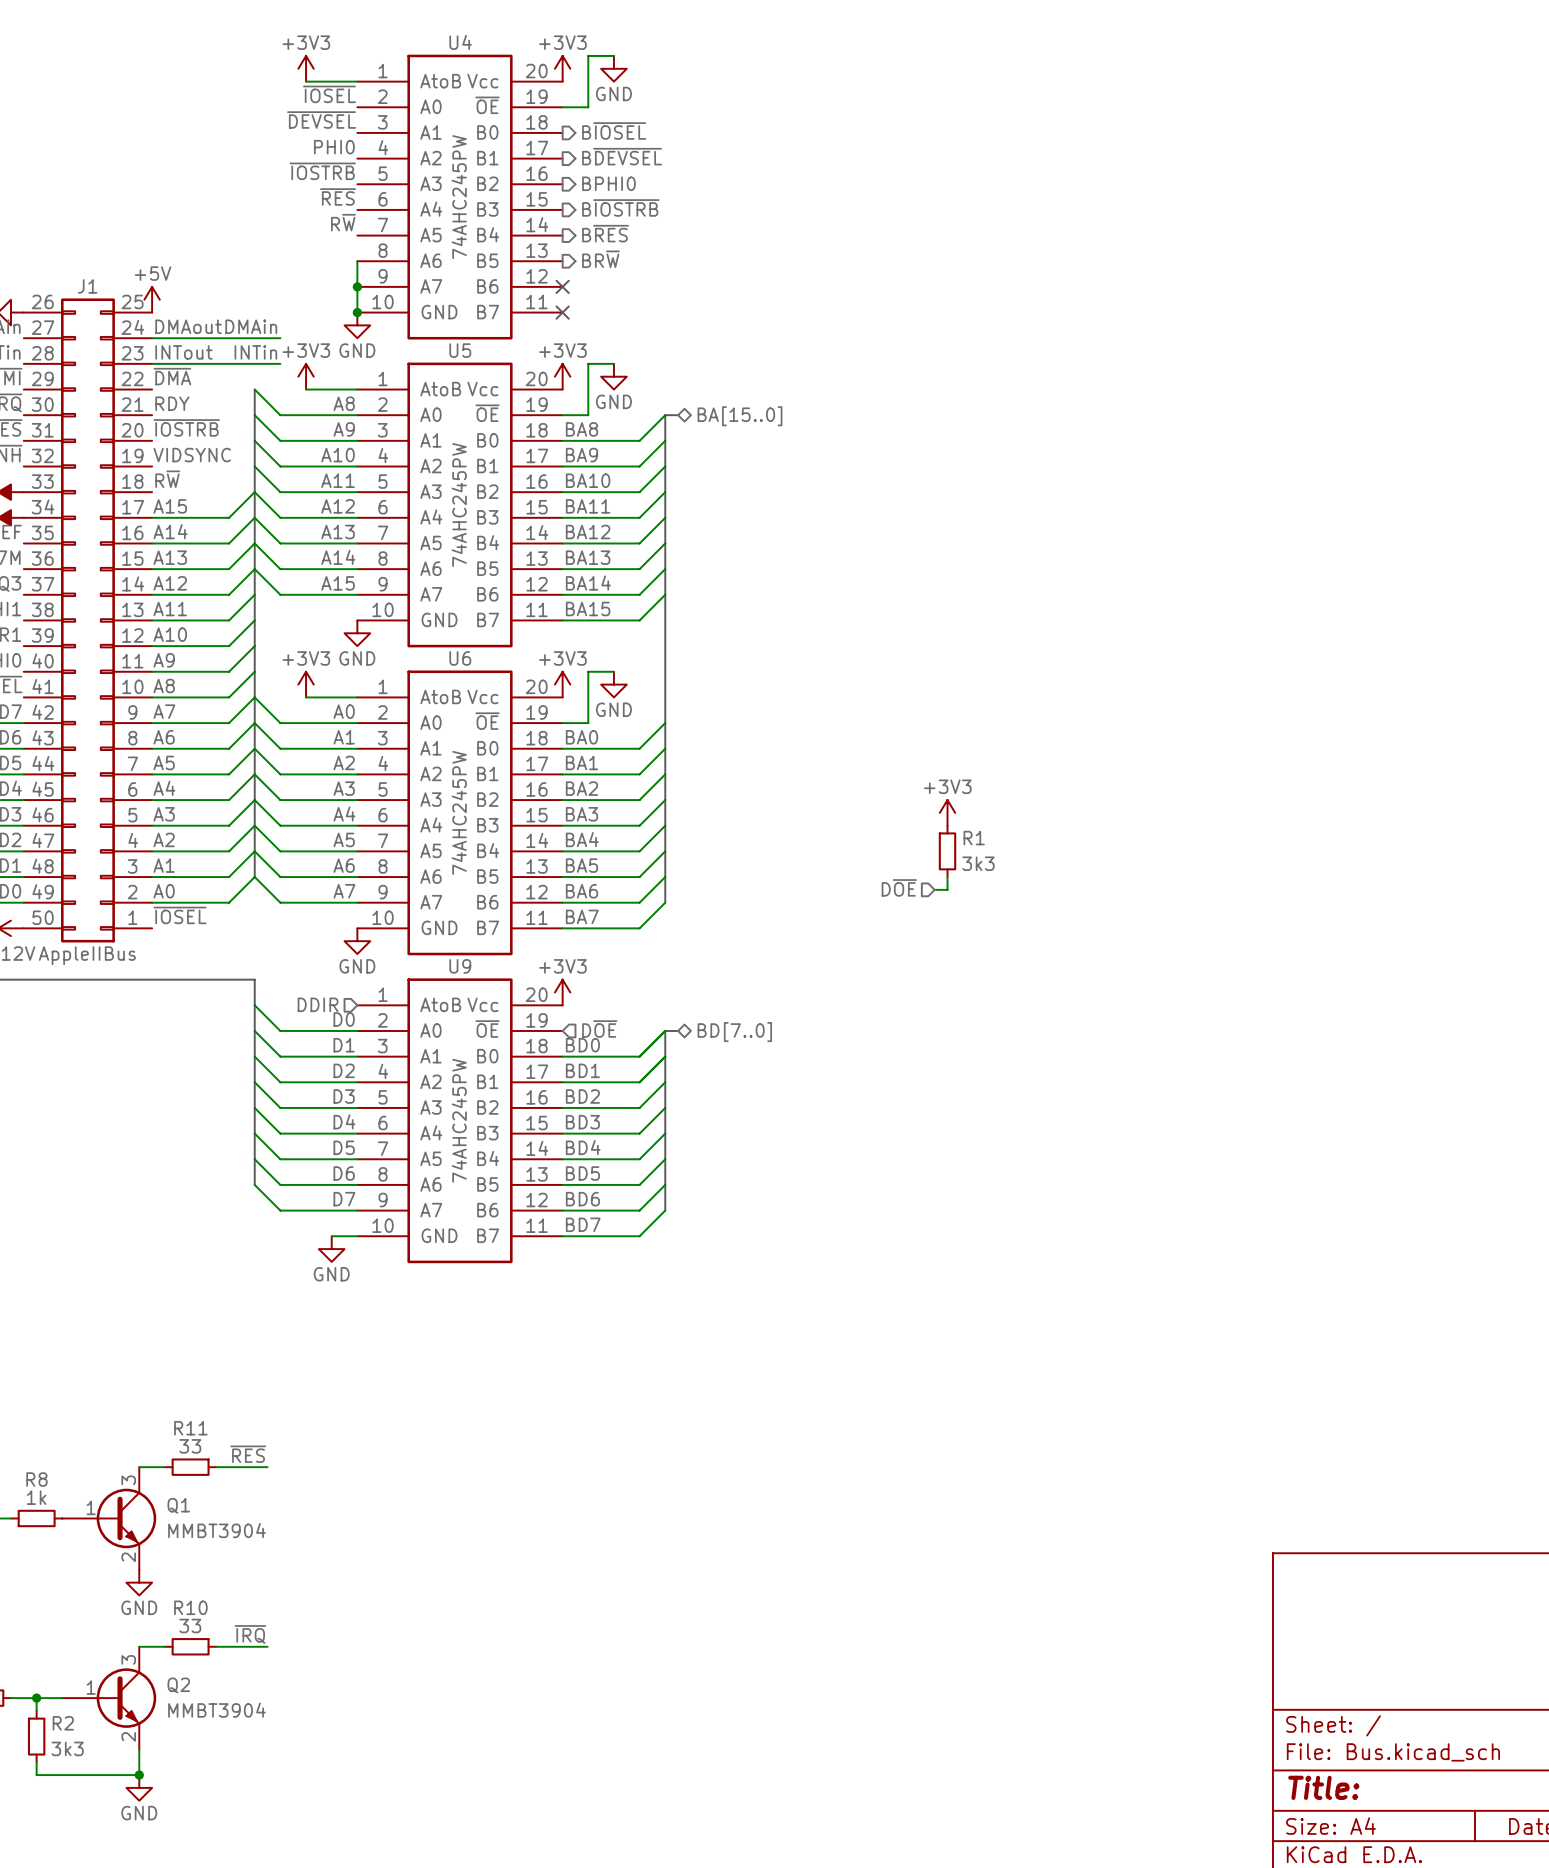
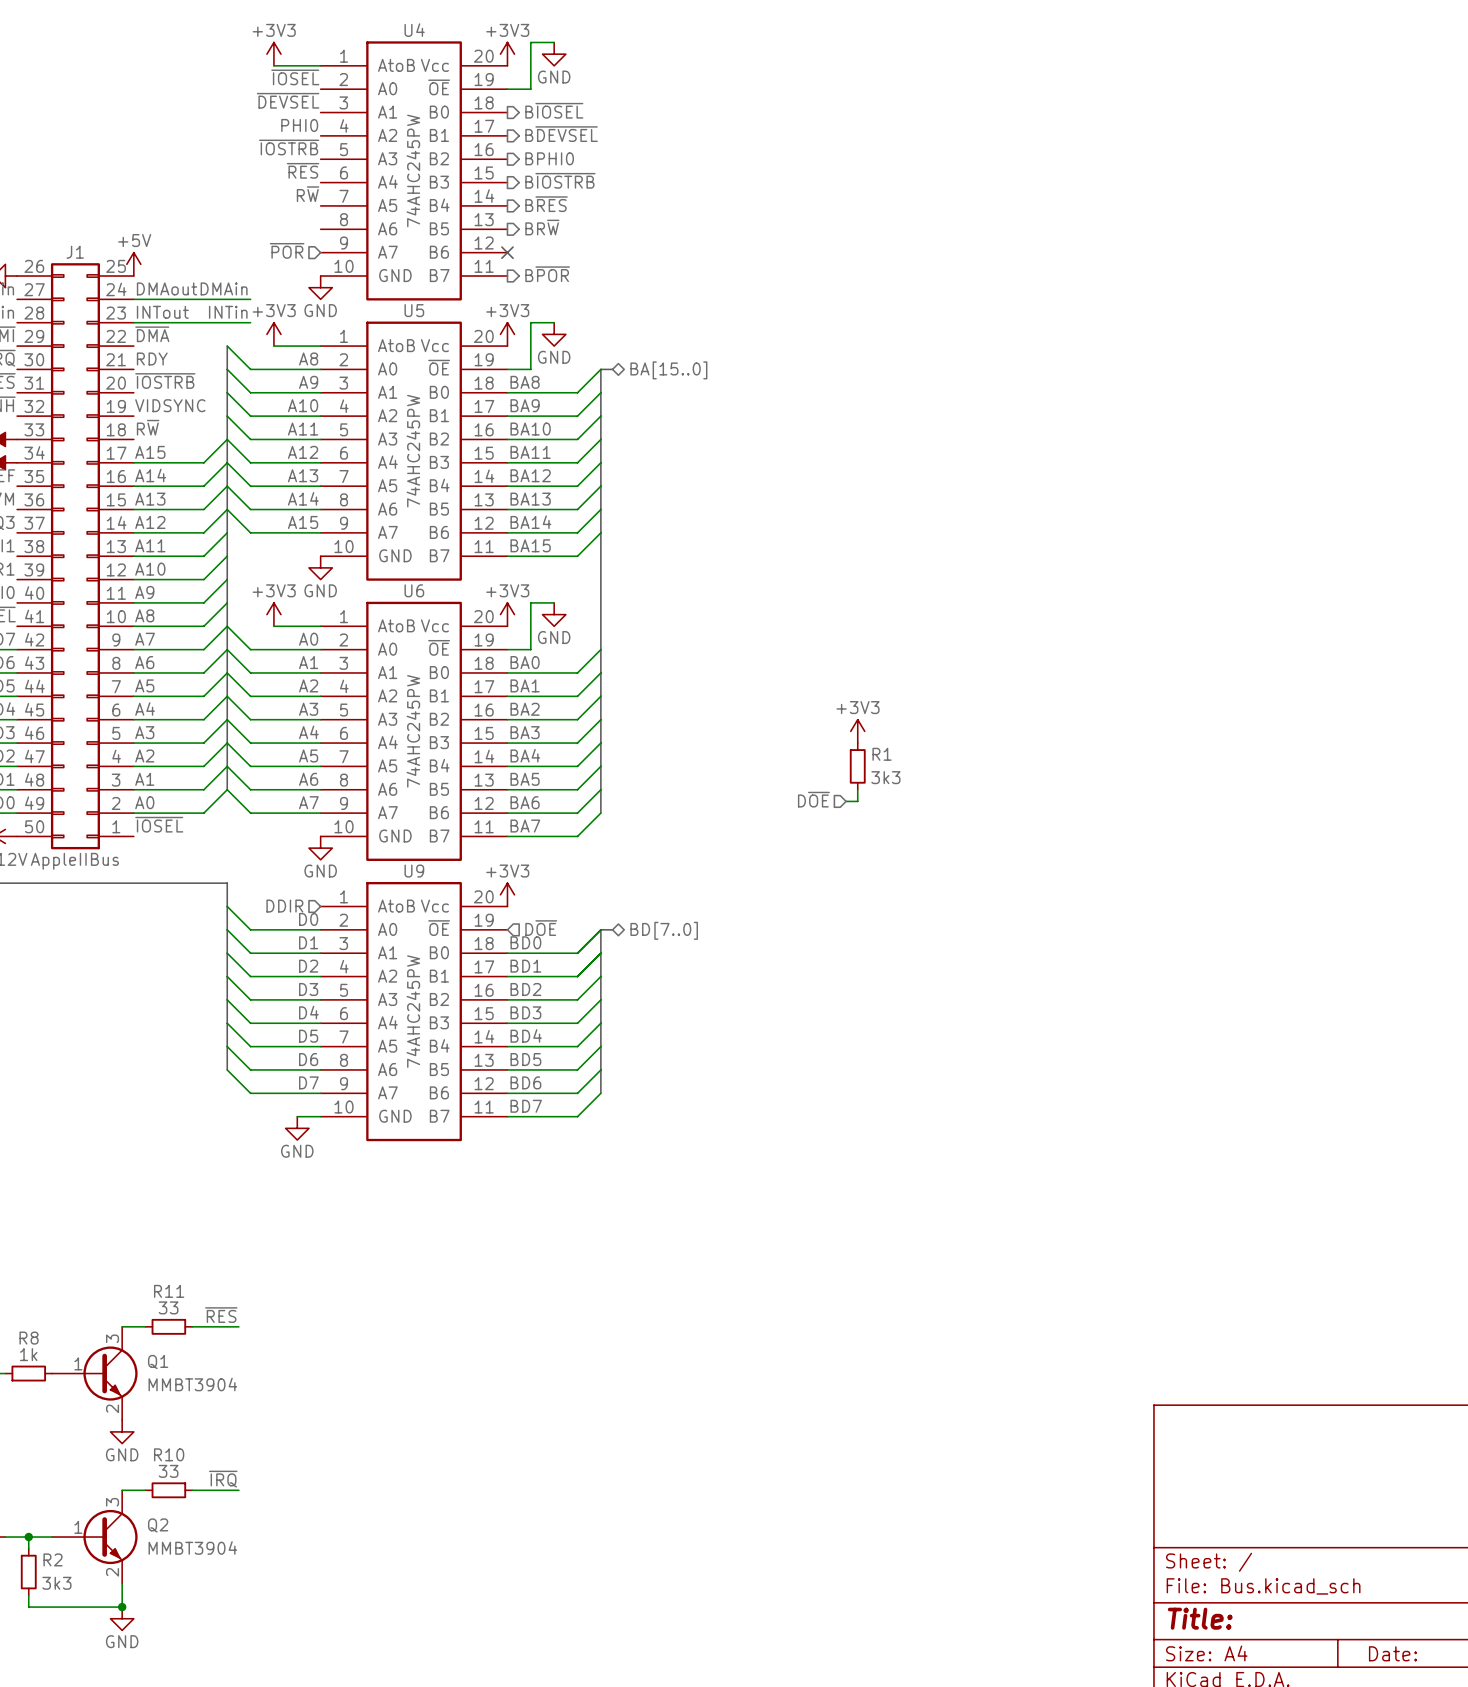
wire: (357, 261) (357, 312) -> none
hierarchical label: none -> ~{POR} (287, 250)
junction: (357, 286) -> none
hierarchical label: none -> B~{POR} (547, 274)
junction: (357, 312) -> none
no-connect mark: (562, 312) -> none

